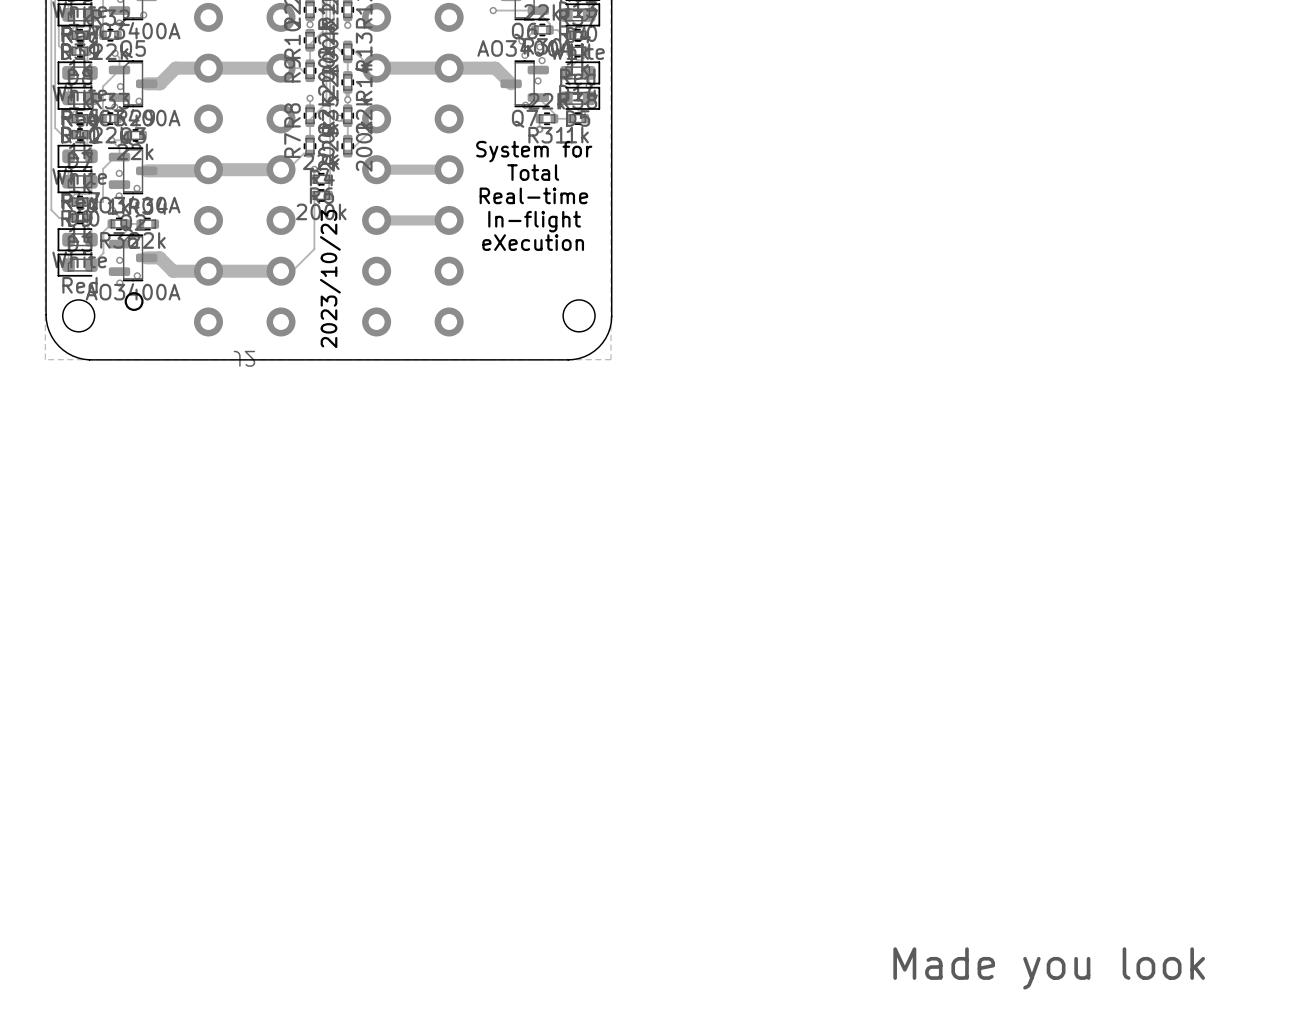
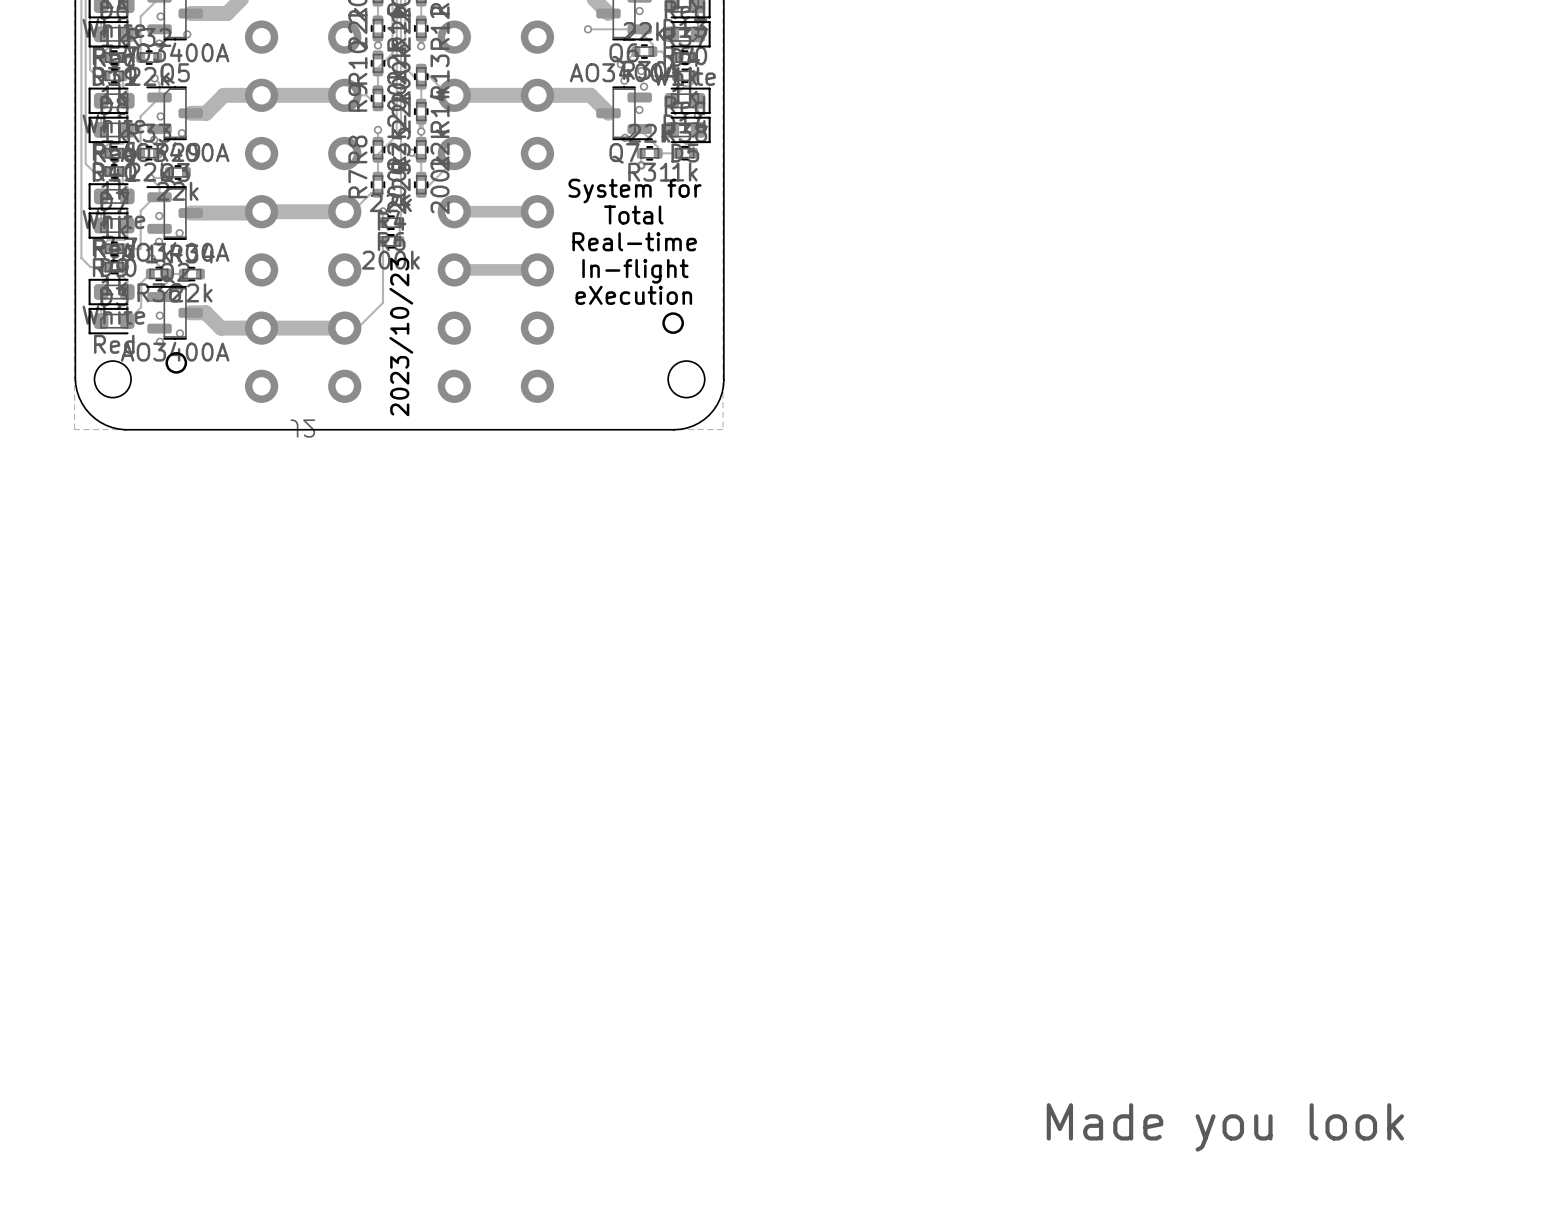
round board edge: none -> [662, 312, 684, 334]

